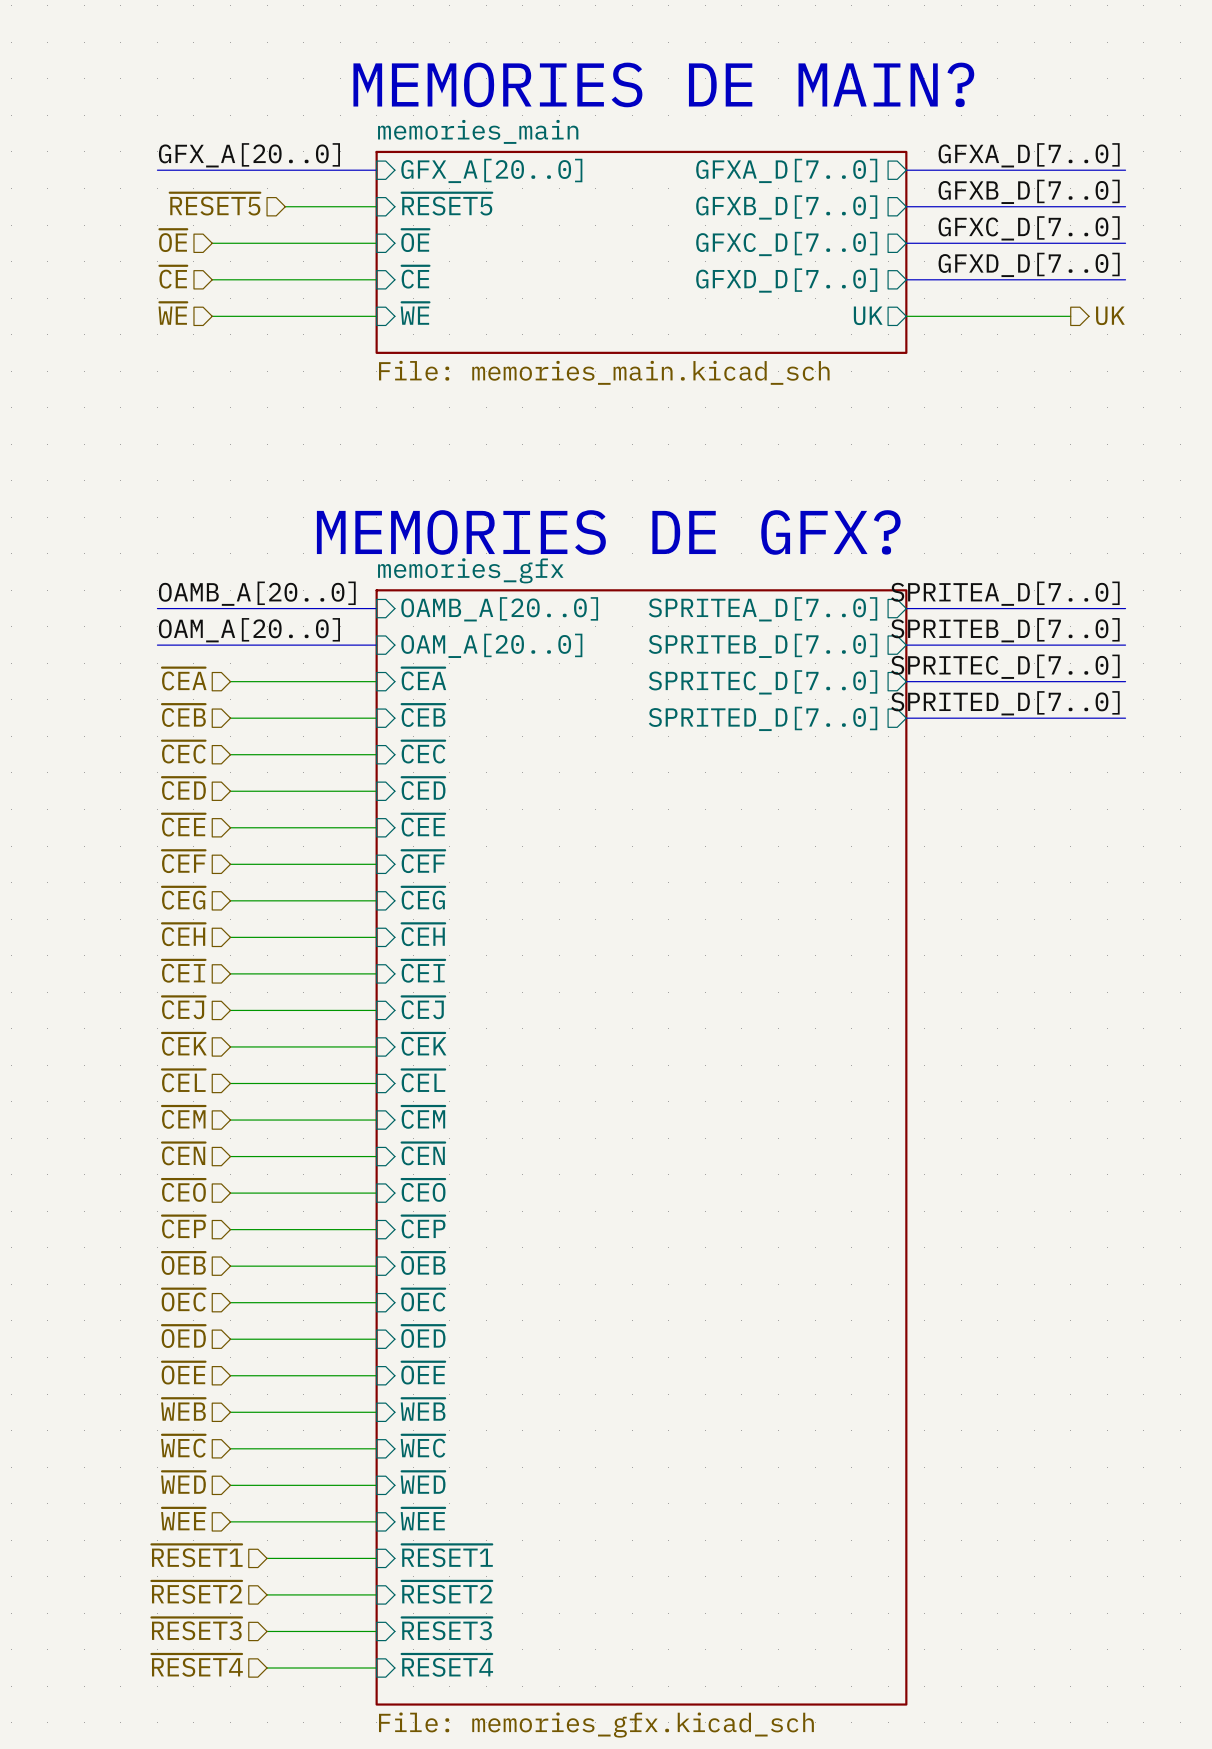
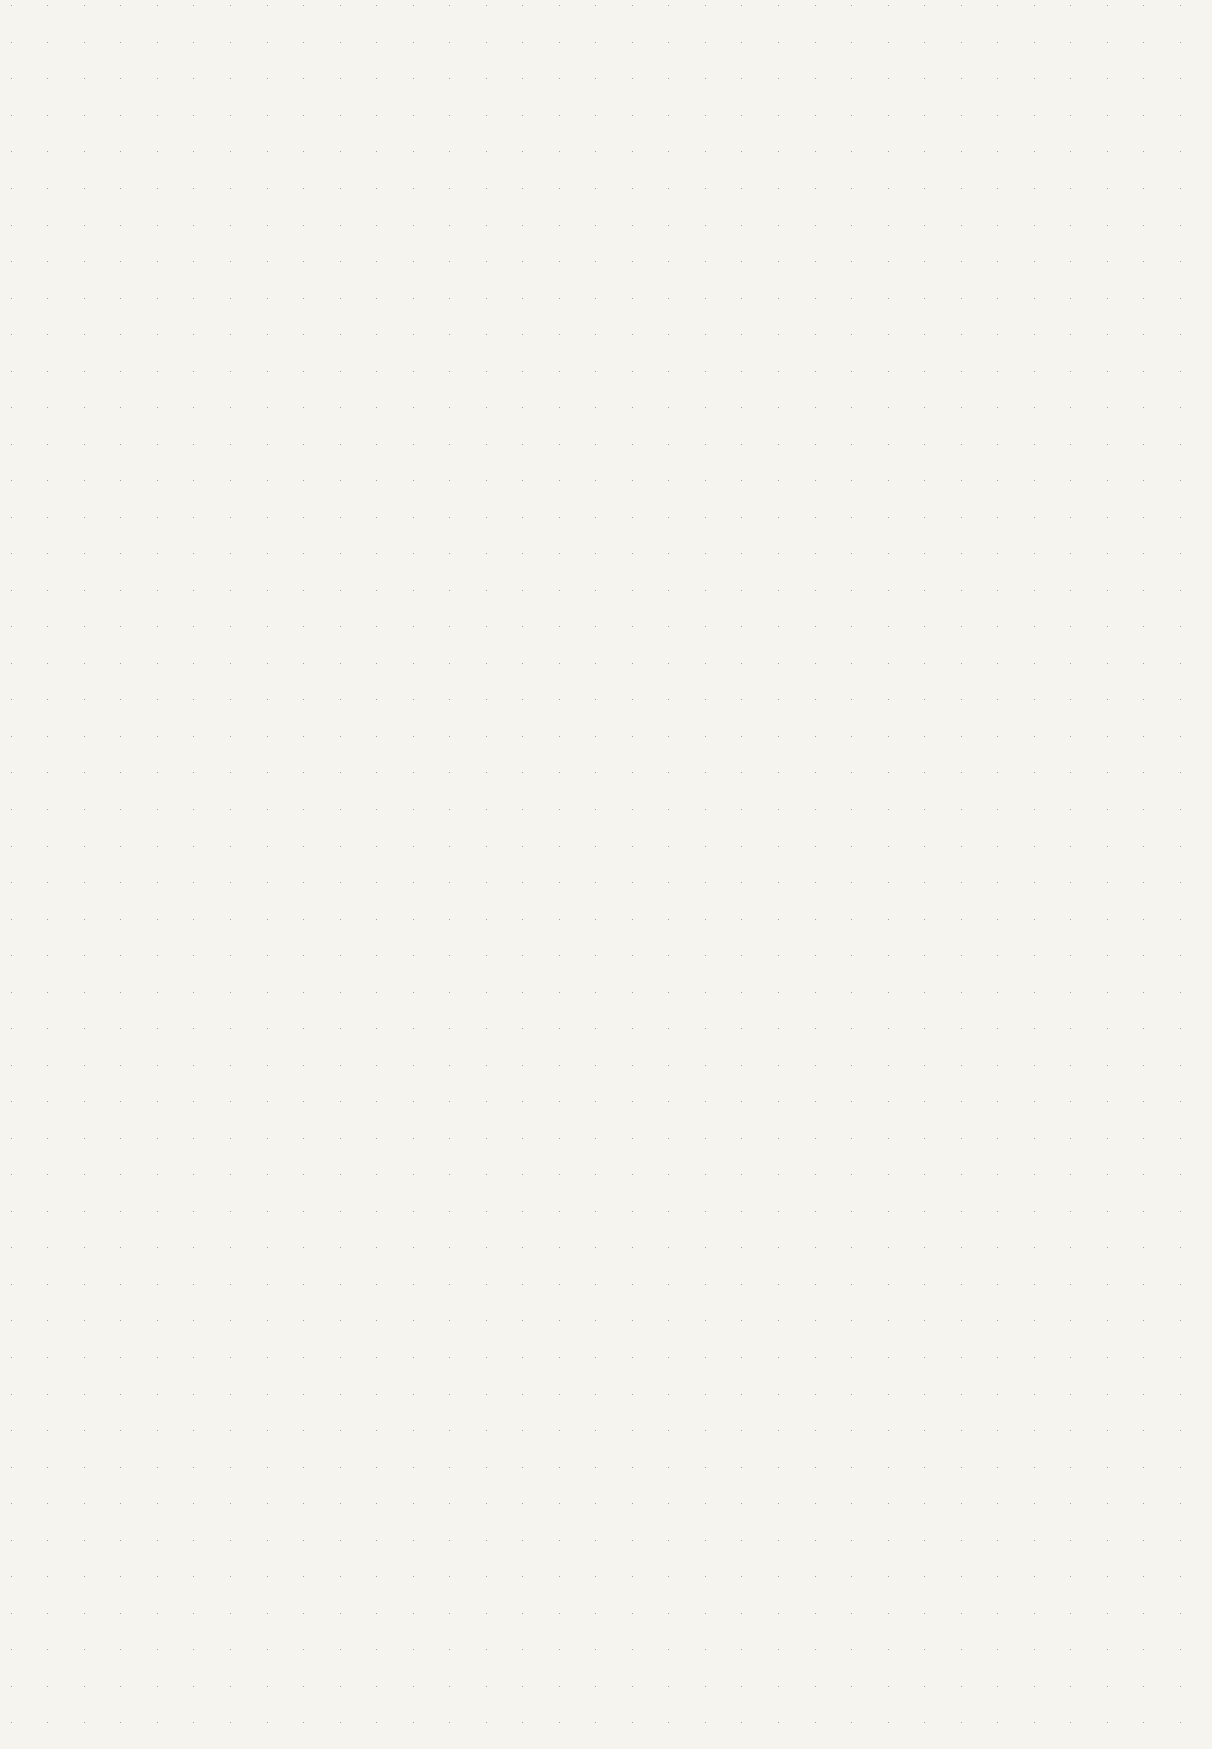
text: MEMORIES DE MAIN? (663, 84) -> none
label: GFX_A[20..0] (249, 155) -> none
label: GFXA_D[7..0] (1029, 155) -> none
bus: (157, 170) (376, 170) -> none
sheet pin: GFX_A[20..0] (491, 170) -> none
sheet pin: GFXA_D[7..0] (786, 170) -> none
bus: (906, 170) (1125, 170) -> none
label: GFXB_D[7..0] (1029, 191) -> none
hierarchical label: ~{RESET5} (215, 204) -> none
sheet pin: ~{RESET5} (446, 204) -> none
wire: (285, 206) (376, 206) -> none
bus: (906, 206) (1125, 206) -> none
sheet pin: GFXB_D[7..0] (786, 207) -> none
label: GFXC_D[7..0] (1029, 228) -> none
hierarchical label: ~{OE} (173, 240) -> none
sheet pin: ~{OE} (415, 240) -> none
wire: (212, 243) (376, 243) -> none
sheet pin: GFXC_D[7..0] (786, 243) -> none
bus: (906, 243) (1125, 243) -> none
sheet memories_main: File: memories_main.kicad_sch (641, 252) -> none
label: GFXD_D[7..0] (1029, 264) -> none
hierarchical label: ~{CE} (173, 277) -> none
sheet pin: ~{CE} (415, 277) -> none
wire: (212, 279) (376, 279) -> none
bus: (906, 279) (1125, 279) -> none
sheet pin: GFXD_D[7..0] (786, 280) -> none
hierarchical label: ~{WE} (172, 313) -> none
sheet pin: ~{WE} (415, 313) -> none
sheet pin: UK (868, 315) -> none
hierarchical label: UK (1110, 315) -> none
wire: (212, 316) (376, 316) -> none
wire: (906, 316) (1070, 316) -> none
text: MEMORIES DE GFX? (608, 532) -> none
label: OAMB_A[20..0] (257, 593) -> none
label: SPRITEA_D[7..0] (1005, 593) -> none
bus: (157, 608) (376, 608) -> none
bus: (906, 608) (1125, 608) -> none
sheet pin: OAMB_A[20..0] (499, 609) -> none
sheet pin: SPRITEA_D[7..0] (763, 609) -> none
label: OAM_A[20..0] (249, 630) -> none
label: SPRITEB_D[7..0] (1005, 630) -> none
bus: (157, 645) (376, 645) -> none
sheet pin: OAM_A[20..0] (491, 645) -> none
sheet pin: SPRITEB_D[7..0] (763, 645) -> none
bus: (906, 645) (1125, 645) -> none
label: SPRITEC_D[7..0] (1005, 666) -> none
hierarchical label: ~{CEA} (184, 679) -> none
sheet pin: ~{CEA} (423, 679) -> none
wire: (230, 681) (376, 681) -> none
bus: (906, 681) (1125, 681) -> none
sheet pin: SPRITEC_D[7..0] (763, 682) -> none
label: SPRITED_D[7..0] (1005, 703) -> none
hierarchical label: ~{CEB} (183, 715) -> none
sheet pin: ~{CEB} (423, 715) -> none
wire: (230, 718) (376, 718) -> none
sheet pin: SPRITED_D[7..0] (763, 718) -> none
bus: (906, 718) (1125, 718) -> none
hierarchical label: ~{CEC} (183, 752) -> none
sheet pin: ~{CEC} (423, 752) -> none
wire: (230, 754) (376, 754) -> none
hierarchical label: ~{CED} (183, 788) -> none
sheet pin: ~{CED} (423, 788) -> none
wire: (230, 791) (376, 791) -> none
hierarchical label: ~{CEE} (183, 825) -> none
sheet pin: ~{CEE} (423, 825) -> none
wire: (230, 827) (376, 827) -> none
hierarchical label: ~{CEF} (183, 861) -> none
sheet pin: ~{CEF} (423, 861) -> none
wire: (230, 864) (376, 864) -> none
hierarchical label: ~{CEG} (183, 898) -> none
sheet pin: ~{CEG} (423, 898) -> none
wire: (230, 900) (376, 900) -> none
hierarchical label: ~{CEH} (183, 934) -> none
sheet pin: ~{CEH} (423, 934) -> none
wire: (230, 937) (376, 937) -> none
hierarchical label: ~{CEI} (183, 971) -> none
sheet pin: ~{CEI} (423, 971) -> none
wire: (230, 973) (376, 973) -> none
hierarchical label: ~{CEJ} (183, 1007) -> none
sheet pin: ~{CEJ} (423, 1007) -> none
wire: (230, 1010) (376, 1010) -> none
hierarchical label: ~{CEK} (184, 1044) -> none
sheet pin: ~{CEK} (424, 1044) -> none
wire: (230, 1046) (376, 1046) -> none
hierarchical label: ~{CEL} (183, 1080) -> none
sheet pin: ~{CEL} (423, 1080) -> none
wire: (230, 1083) (376, 1083) -> none
hierarchical label: ~{CEM} (183, 1117) -> none
sheet pin: ~{CEM} (423, 1117) -> none
wire: (230, 1120) (376, 1120) -> none
sheet memories_gfx: File: memories_gfx.kicad_sch (641, 1147) -> none
hierarchical label: ~{CEN} (183, 1153) -> none
sheet pin: ~{CEN} (423, 1153) -> none
wire: (230, 1156) (376, 1156) -> none
hierarchical label: ~{CEO} (183, 1190) -> none
sheet pin: ~{CEO} (423, 1190) -> none
wire: (230, 1193) (376, 1193) -> none
hierarchical label: ~{CEP} (183, 1226) -> none
sheet pin: ~{CEP} (423, 1226) -> none
wire: (230, 1229) (376, 1229) -> none
hierarchical label: ~{OEB} (183, 1263) -> none
sheet pin: ~{OEB} (423, 1263) -> none
wire: (230, 1266) (376, 1266) -> none
hierarchical label: ~{OEC} (183, 1300) -> none
sheet pin: ~{OEC} (423, 1300) -> none
wire: (230, 1302) (376, 1302) -> none
hierarchical label: ~{OED} (183, 1336) -> none
sheet pin: ~{OED} (423, 1336) -> none
wire: (230, 1339) (376, 1339) -> none
hierarchical label: ~{OEE} (183, 1373) -> none
sheet pin: ~{OEE} (423, 1373) -> none
wire: (230, 1375) (376, 1375) -> none
hierarchical label: ~{WEB} (183, 1409) -> none
sheet pin: ~{WEB} (423, 1409) -> none
wire: (230, 1412) (376, 1412) -> none
hierarchical label: ~{WEC} (183, 1446) -> none
sheet pin: ~{WEC} (423, 1446) -> none
wire: (230, 1448) (376, 1448) -> none
hierarchical label: ~{WED} (183, 1482) -> none
sheet pin: ~{WED} (423, 1482) -> none
wire: (230, 1485) (376, 1485) -> none
hierarchical label: ~{WEE} (183, 1519) -> none
sheet pin: ~{WEE} (422, 1519) -> none
wire: (230, 1521) (376, 1521) -> none
hierarchical label: ~{RESET1} (197, 1555) -> none
sheet pin: ~{RESET1} (447, 1555) -> none
wire: (267, 1558) (376, 1558) -> none
hierarchical label: ~{RESET2} (196, 1592) -> none
sheet pin: ~{RESET2} (447, 1592) -> none
wire: (267, 1594) (376, 1594) -> none
hierarchical label: ~{RESET3} (196, 1628) -> none
sheet pin: ~{RESET3} (446, 1628) -> none
wire: (267, 1631) (376, 1631) -> none
hierarchical label: ~{RESET4} (197, 1665) -> none
sheet pin: ~{RESET4} (447, 1665) -> none
wire: (267, 1668) (376, 1668) -> none

